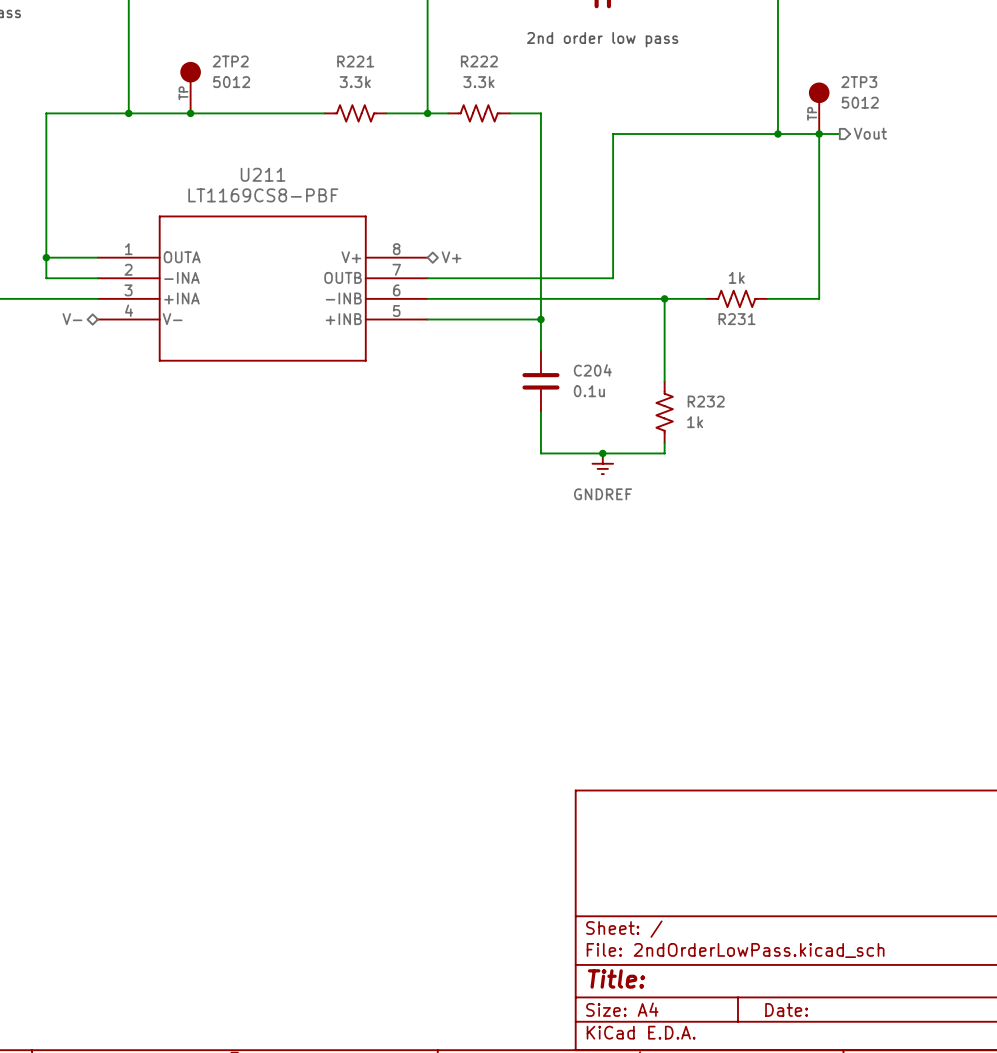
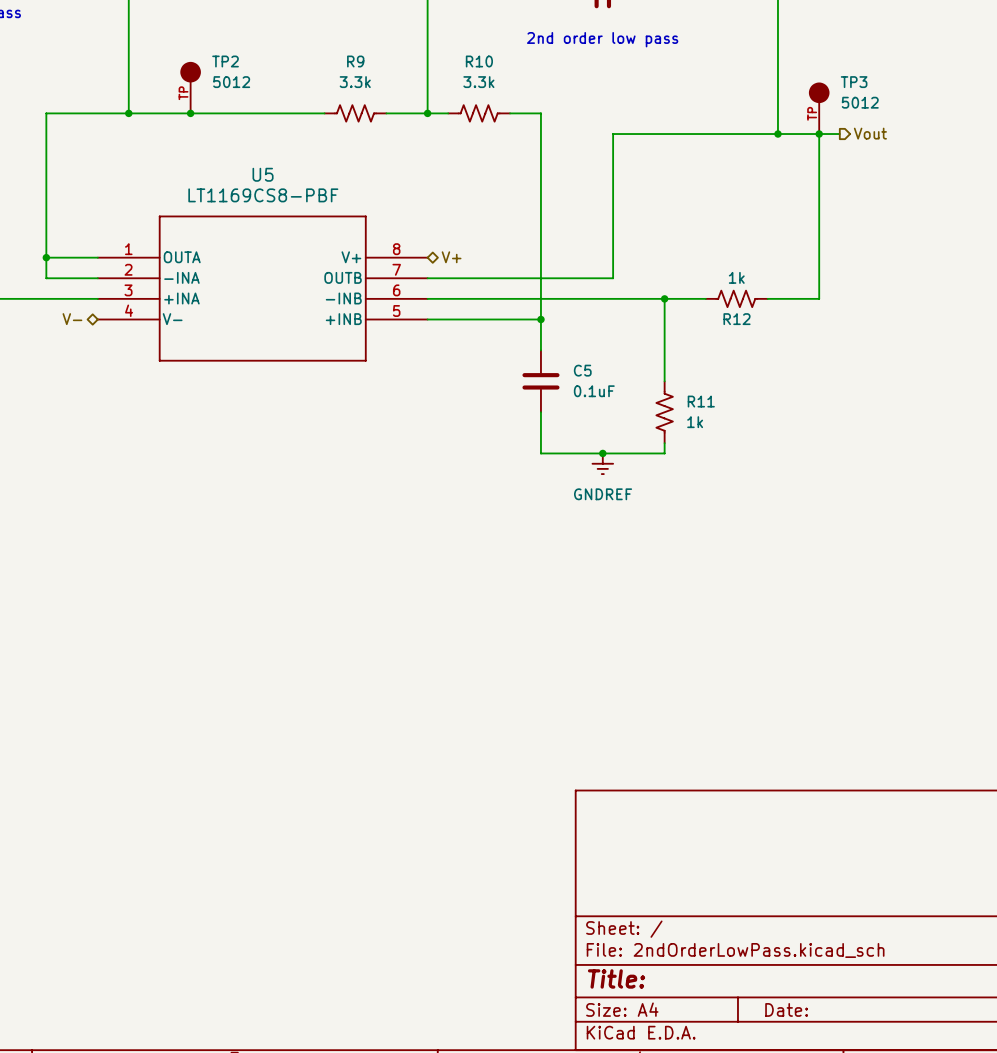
2TP2 name: 2TP2 (230, 61) -> TP2 (225, 61)
R221 name: R221 (355, 61) -> R9 (355, 61)
R222 name: R222 (479, 61) -> R10 (479, 61)
2TP3 name: 2TP3 (859, 82) -> TP3 (854, 82)
U211 name: U211 (263, 174) -> U5 (263, 174)
R231 name: R231 (737, 319) -> R12 (737, 319)
C204 name: C204 (592, 370) -> C5 (582, 370)
C204 value: 0.1u (589, 391) -> 0.1uF (594, 391)
R232 name: R232 (706, 401) -> R11 (701, 401)

